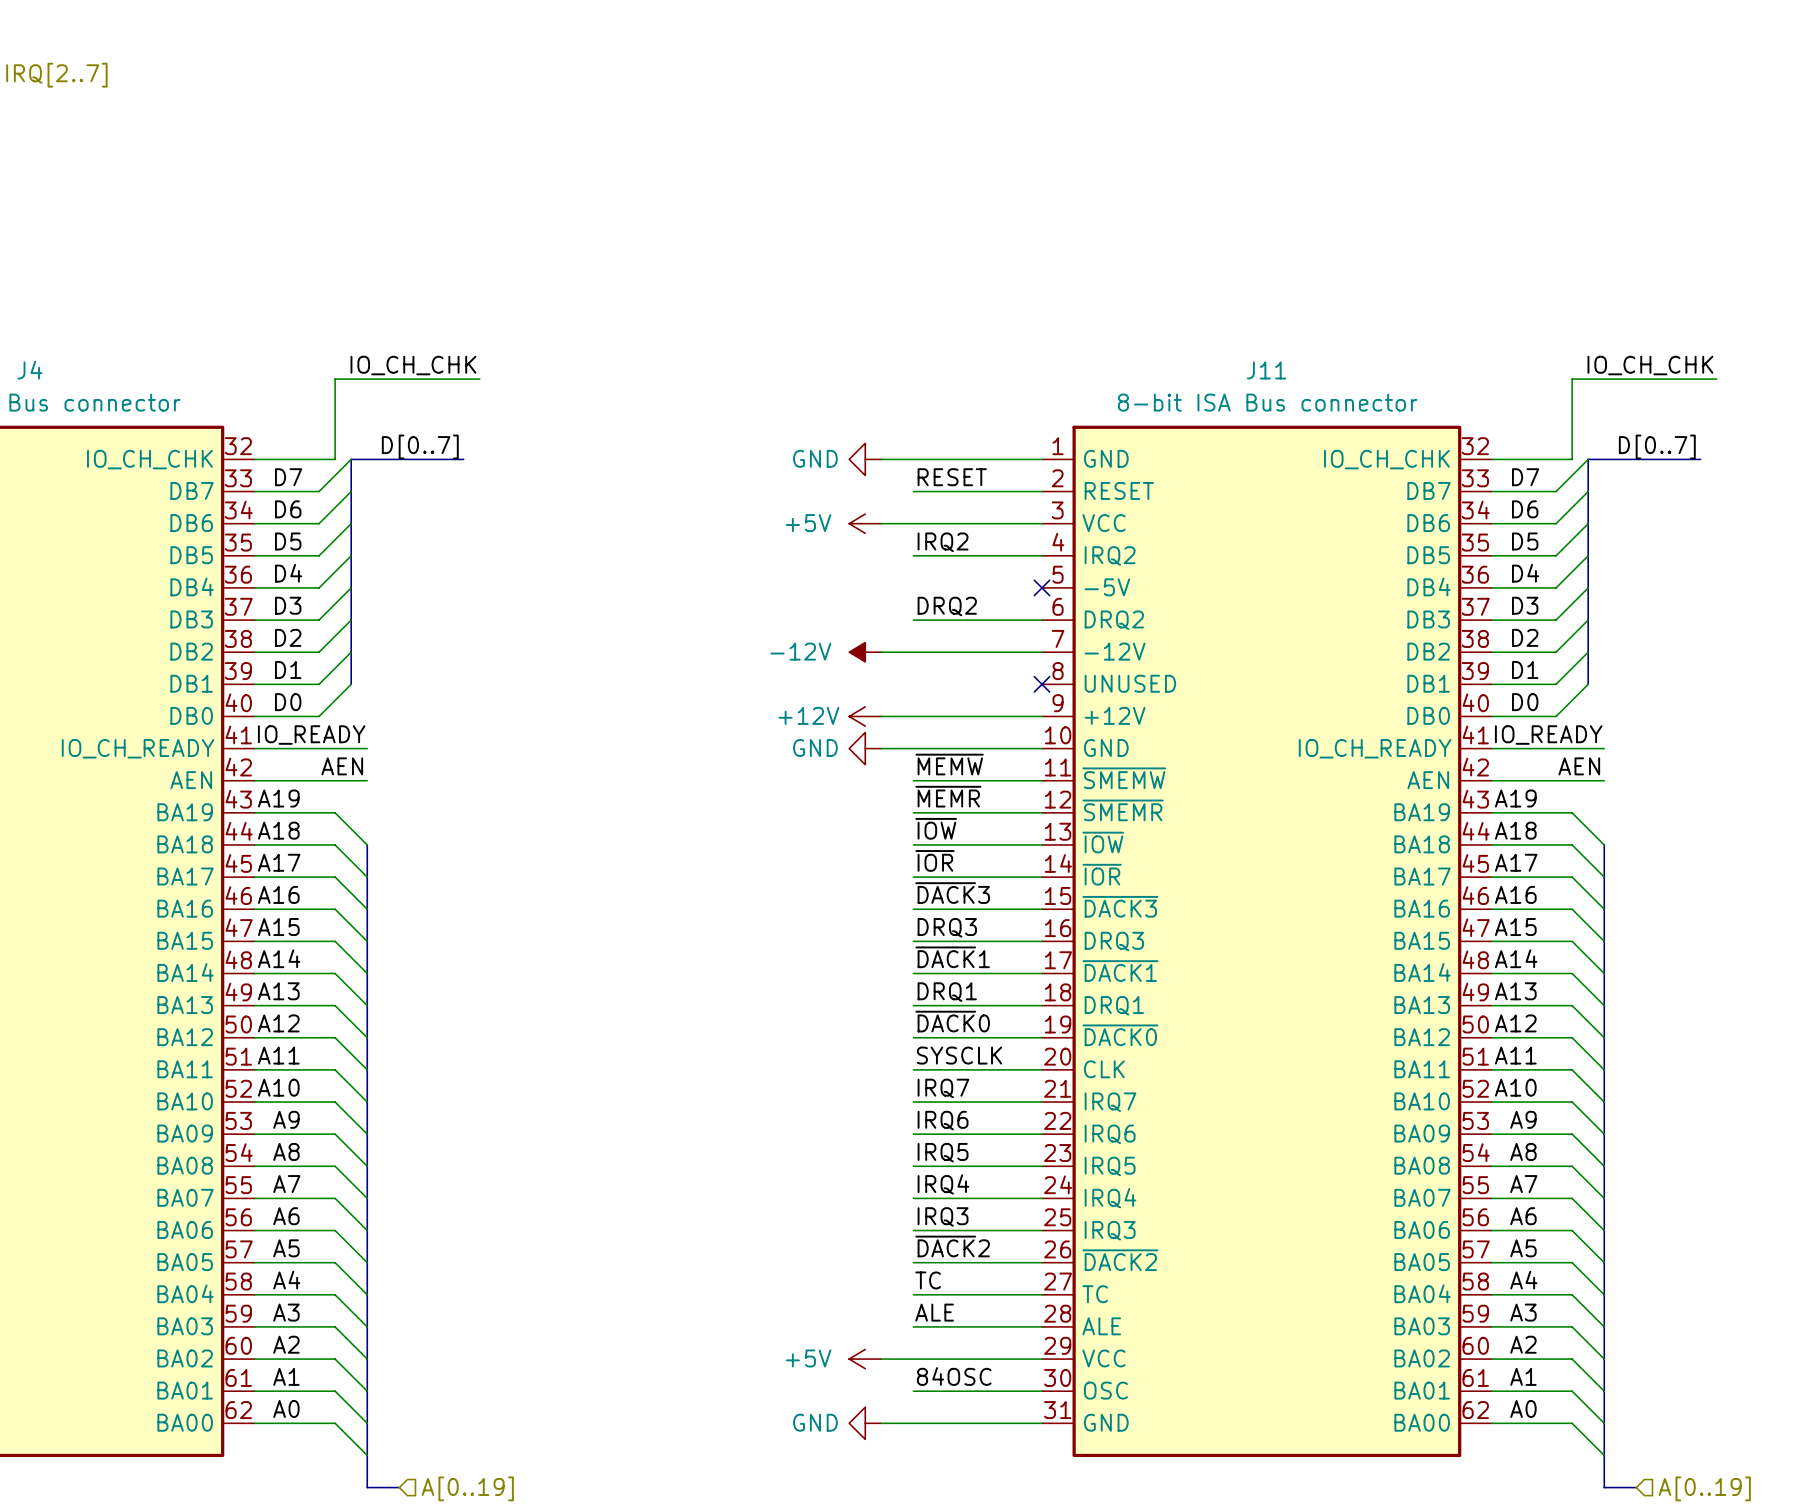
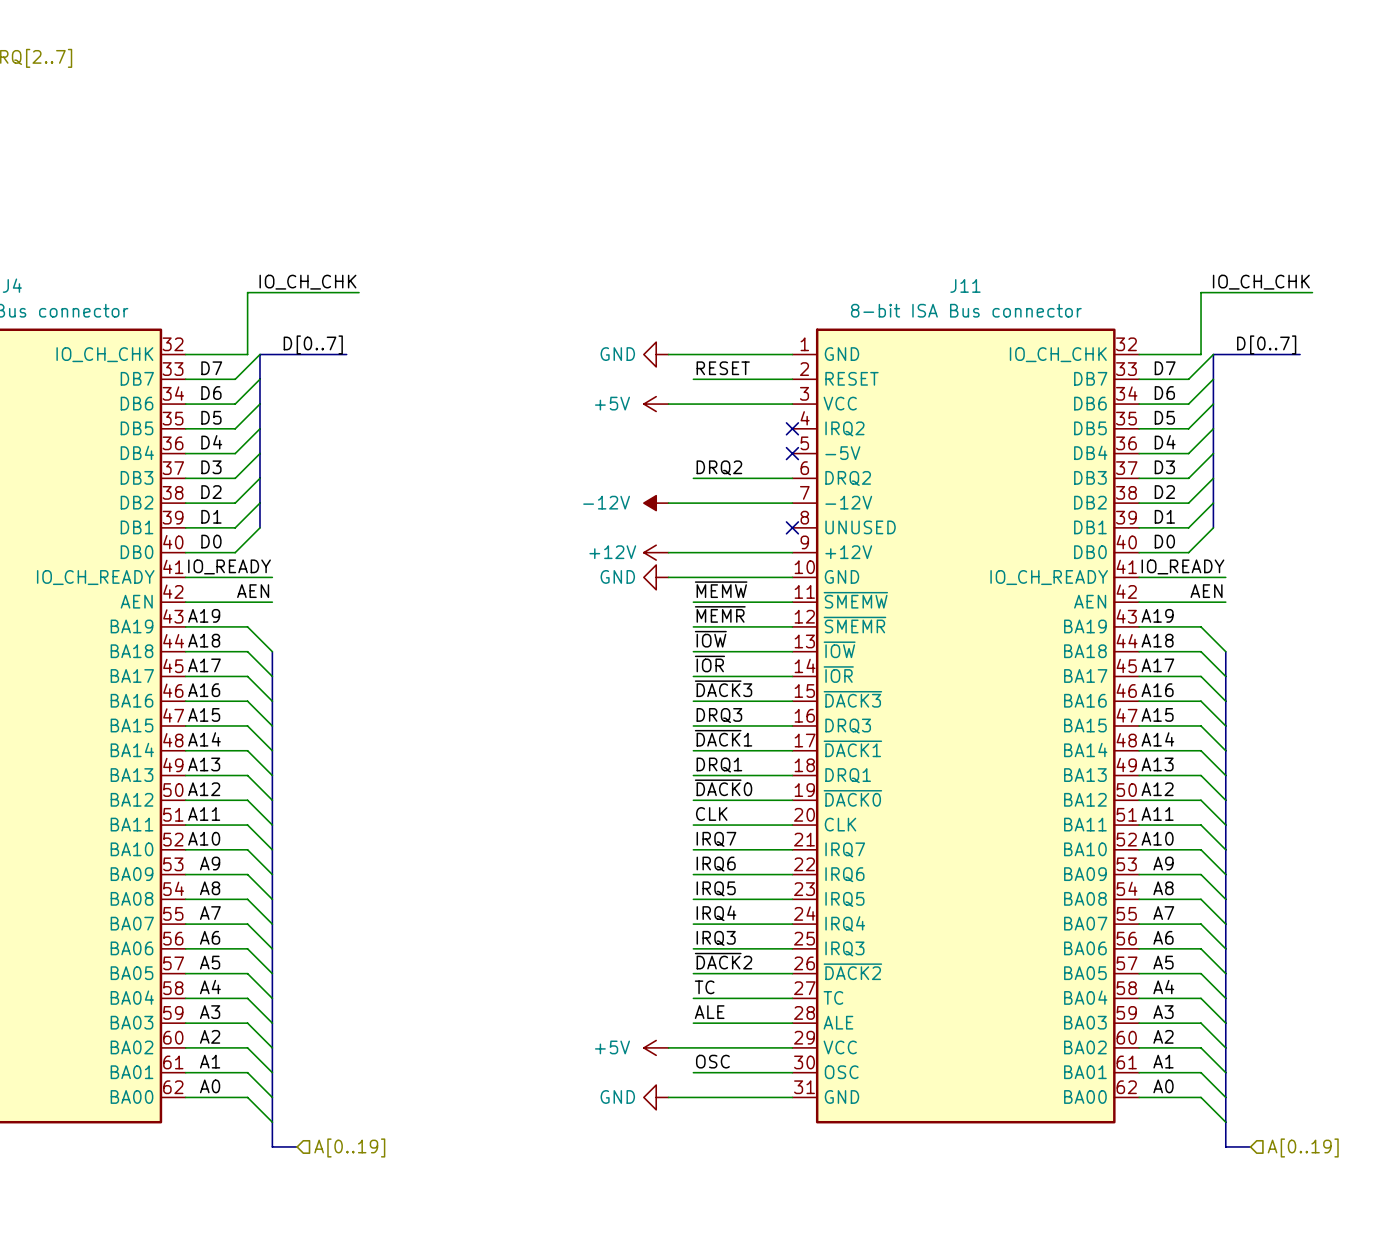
label: IRQ2 (943, 542) -> none
wire: (913, 555) (1041, 555) -> none
no-connect mark: none -> (792, 428)
label: SYSCLK (959, 1055) -> CLK (711, 813)
label: 84OSC (954, 1376) -> OSC (712, 1061)

